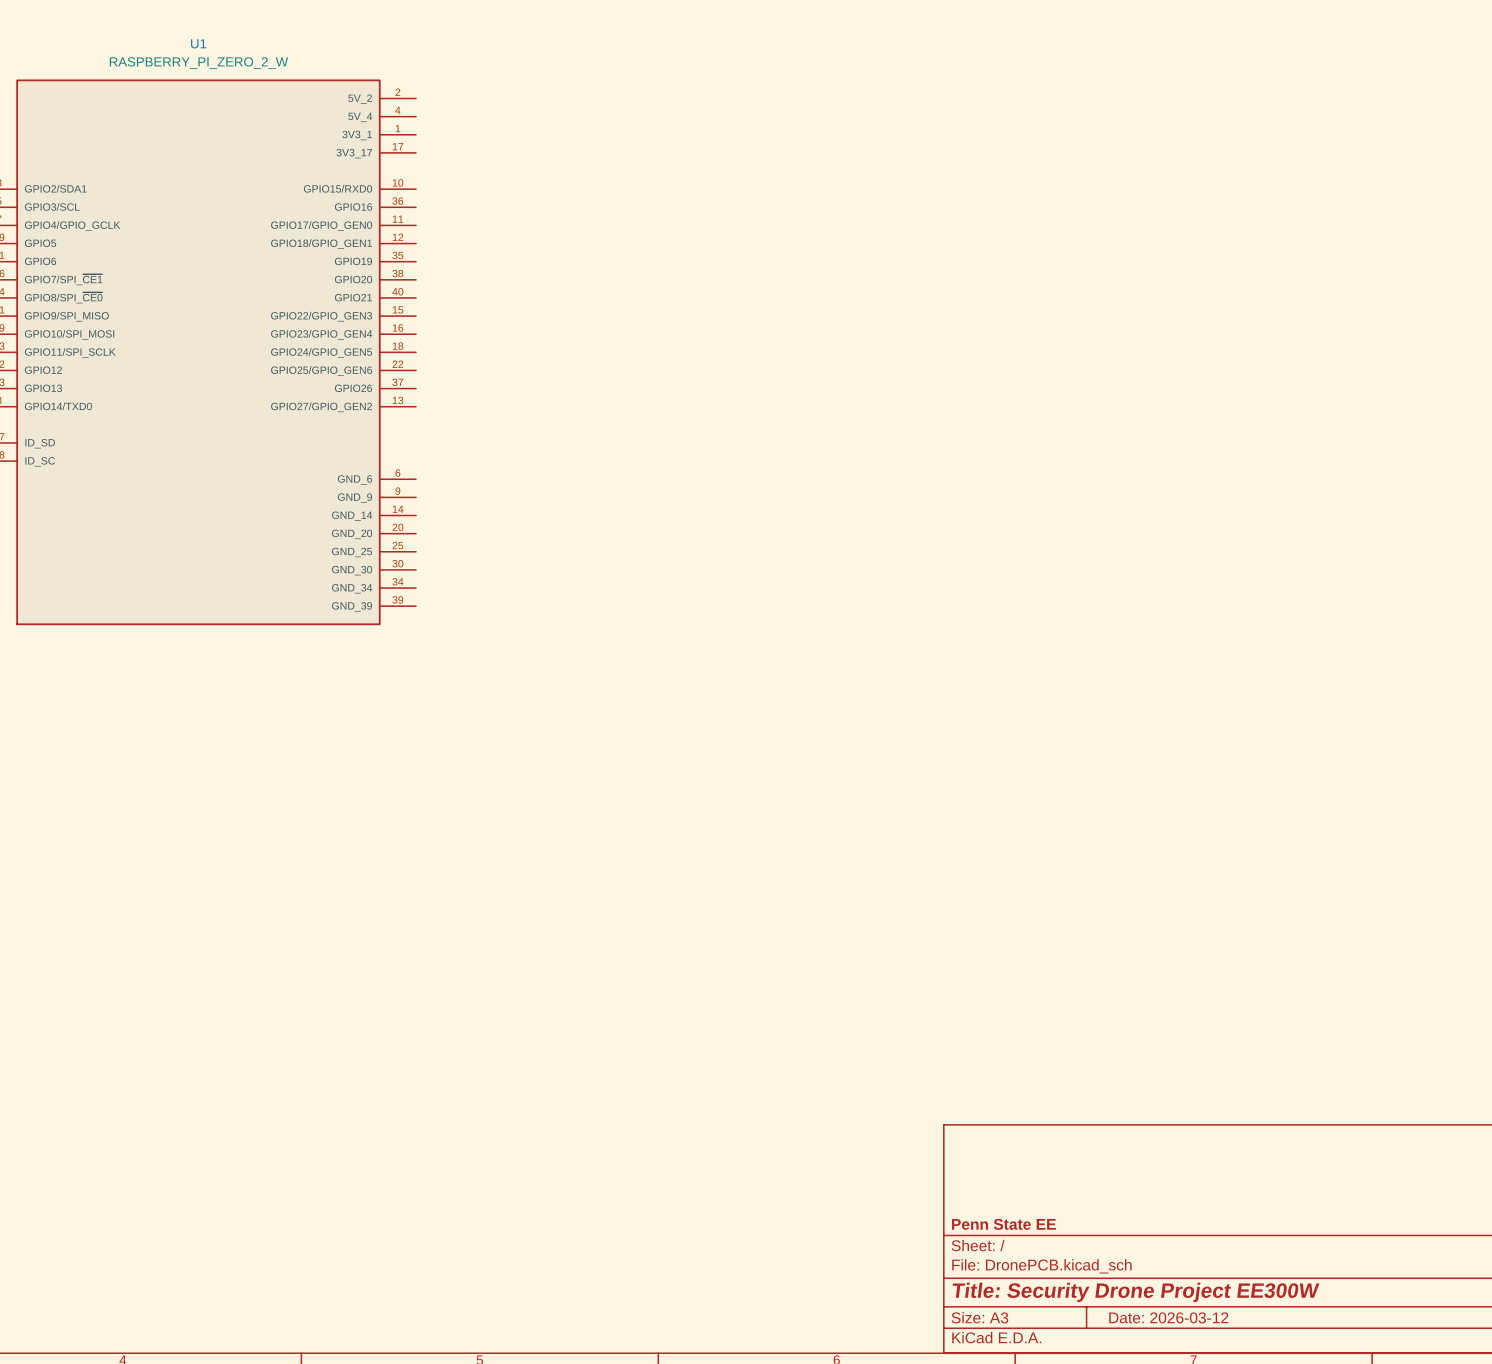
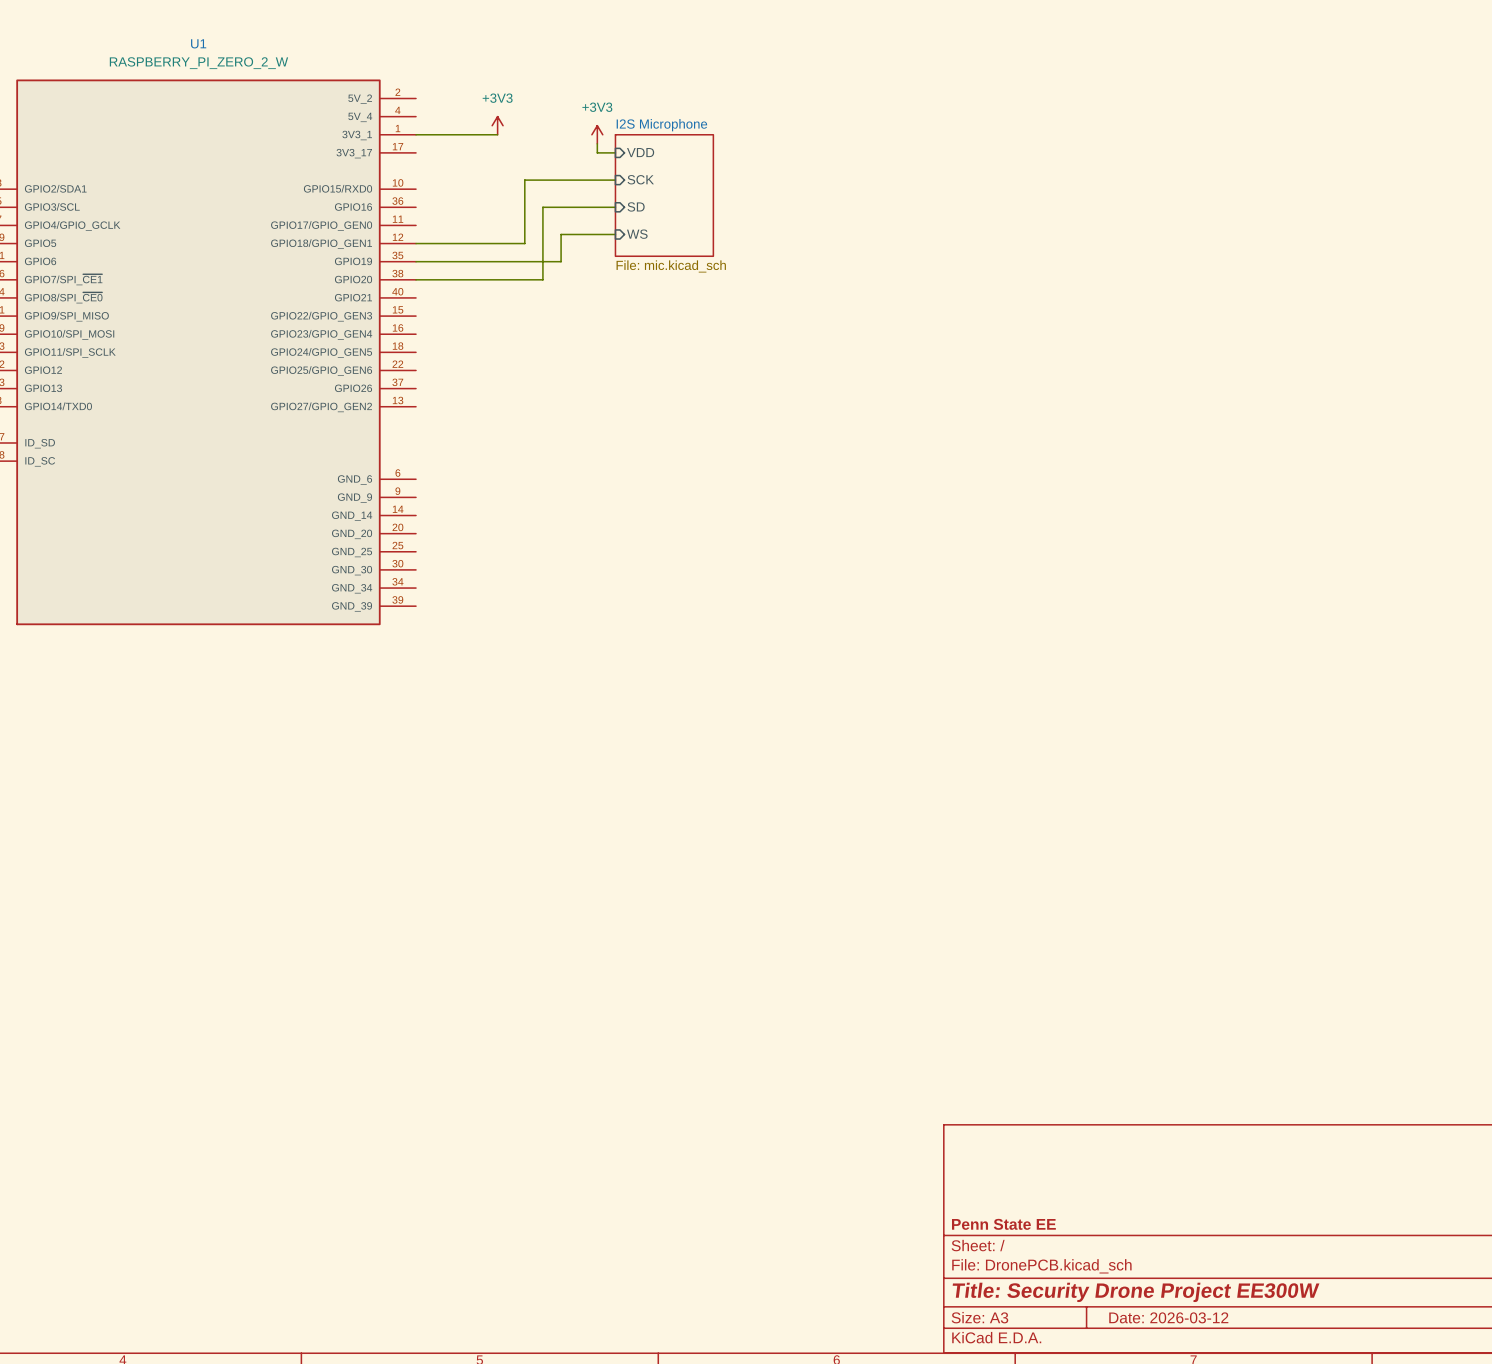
power symbol: none -> +3V3 (497, 125)
wire: none -> (416, 134) (497, 134)
power symbol: none -> +3V3 (597, 134)
wire: none -> (597, 143) (597, 152) (615, 152)
sheet pin: none -> VDD (640, 152)
sheet pin: none -> SCK (640, 179)
wire: none -> (615, 180) (524, 180) (524, 243) (416, 243)
sheet I2S Microphone: none -> File: mic.kicad_sch (664, 195)
sheet pin: none -> SD (636, 206)
wire: none -> (615, 207) (542, 207) (542, 279) (416, 279)
wire: none -> (615, 234) (561, 234) (561, 261) (416, 261)
sheet pin: none -> WS (637, 234)

